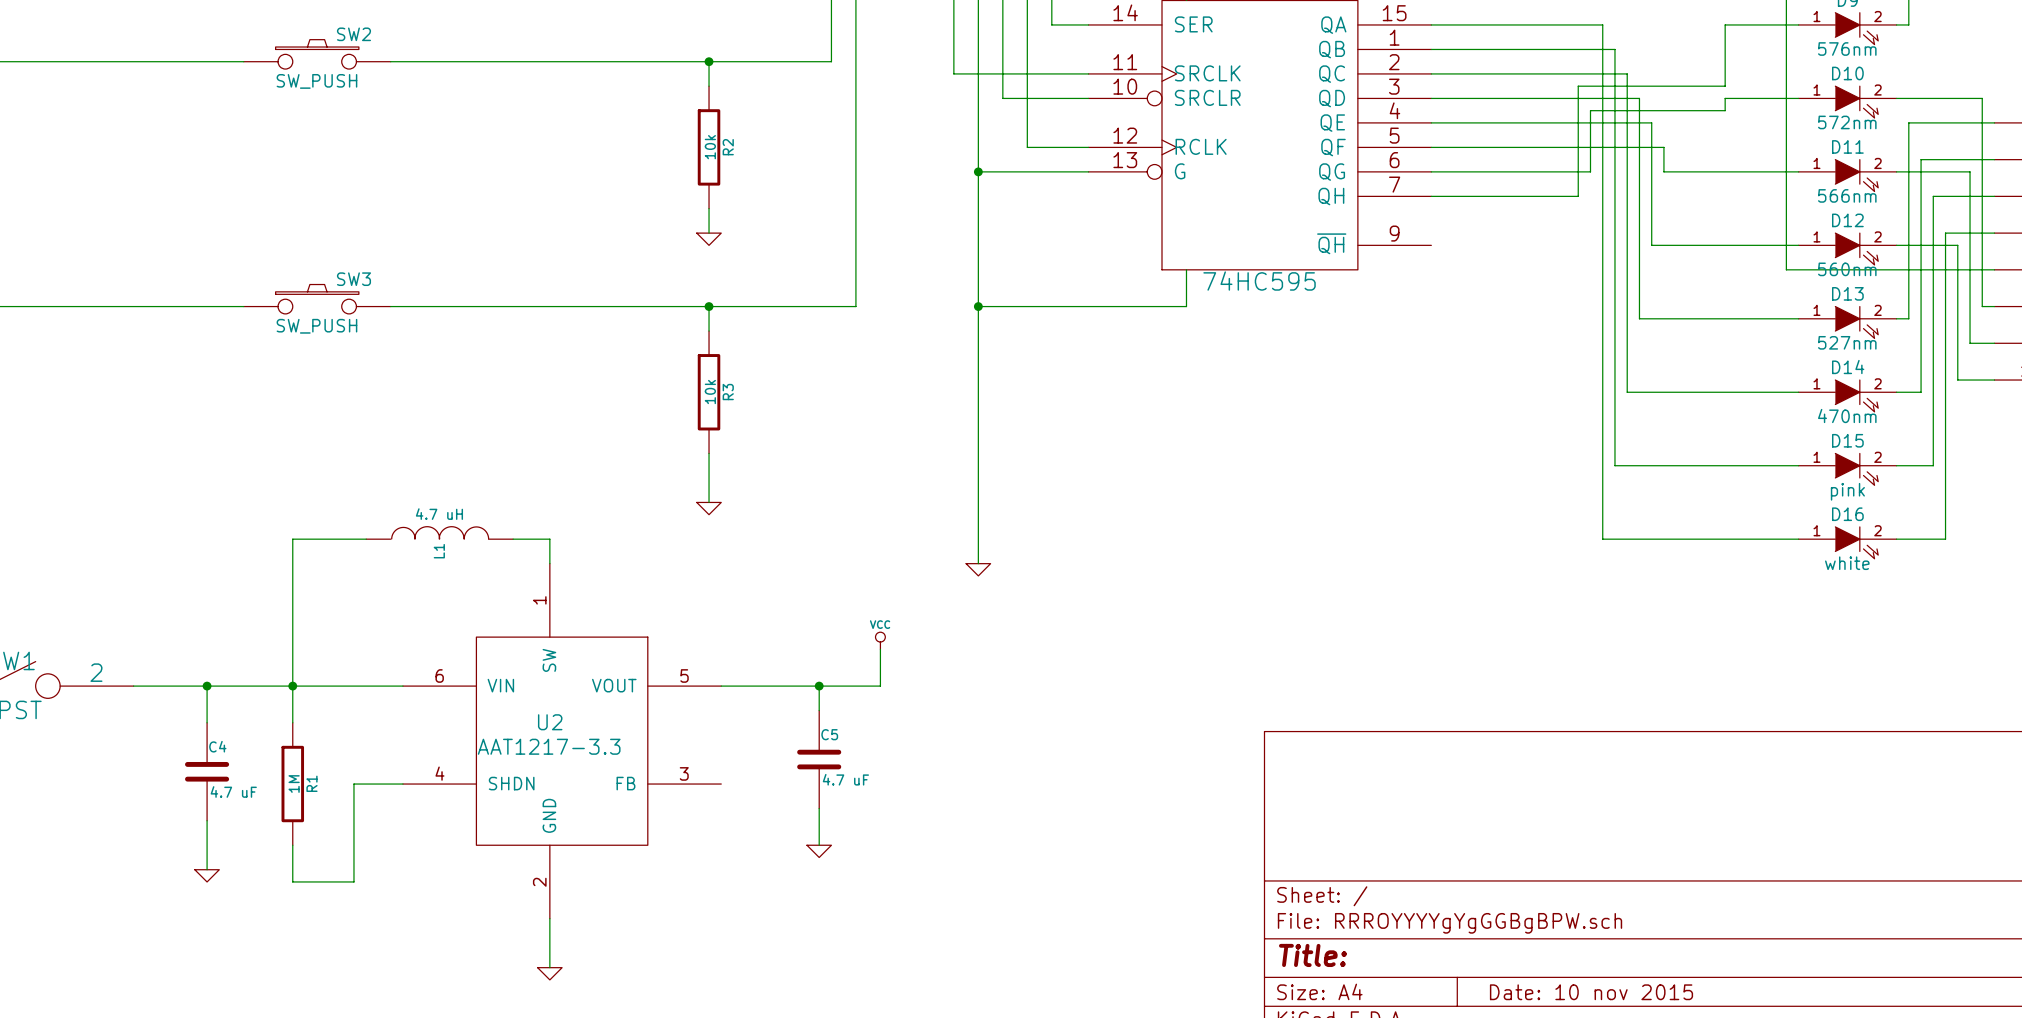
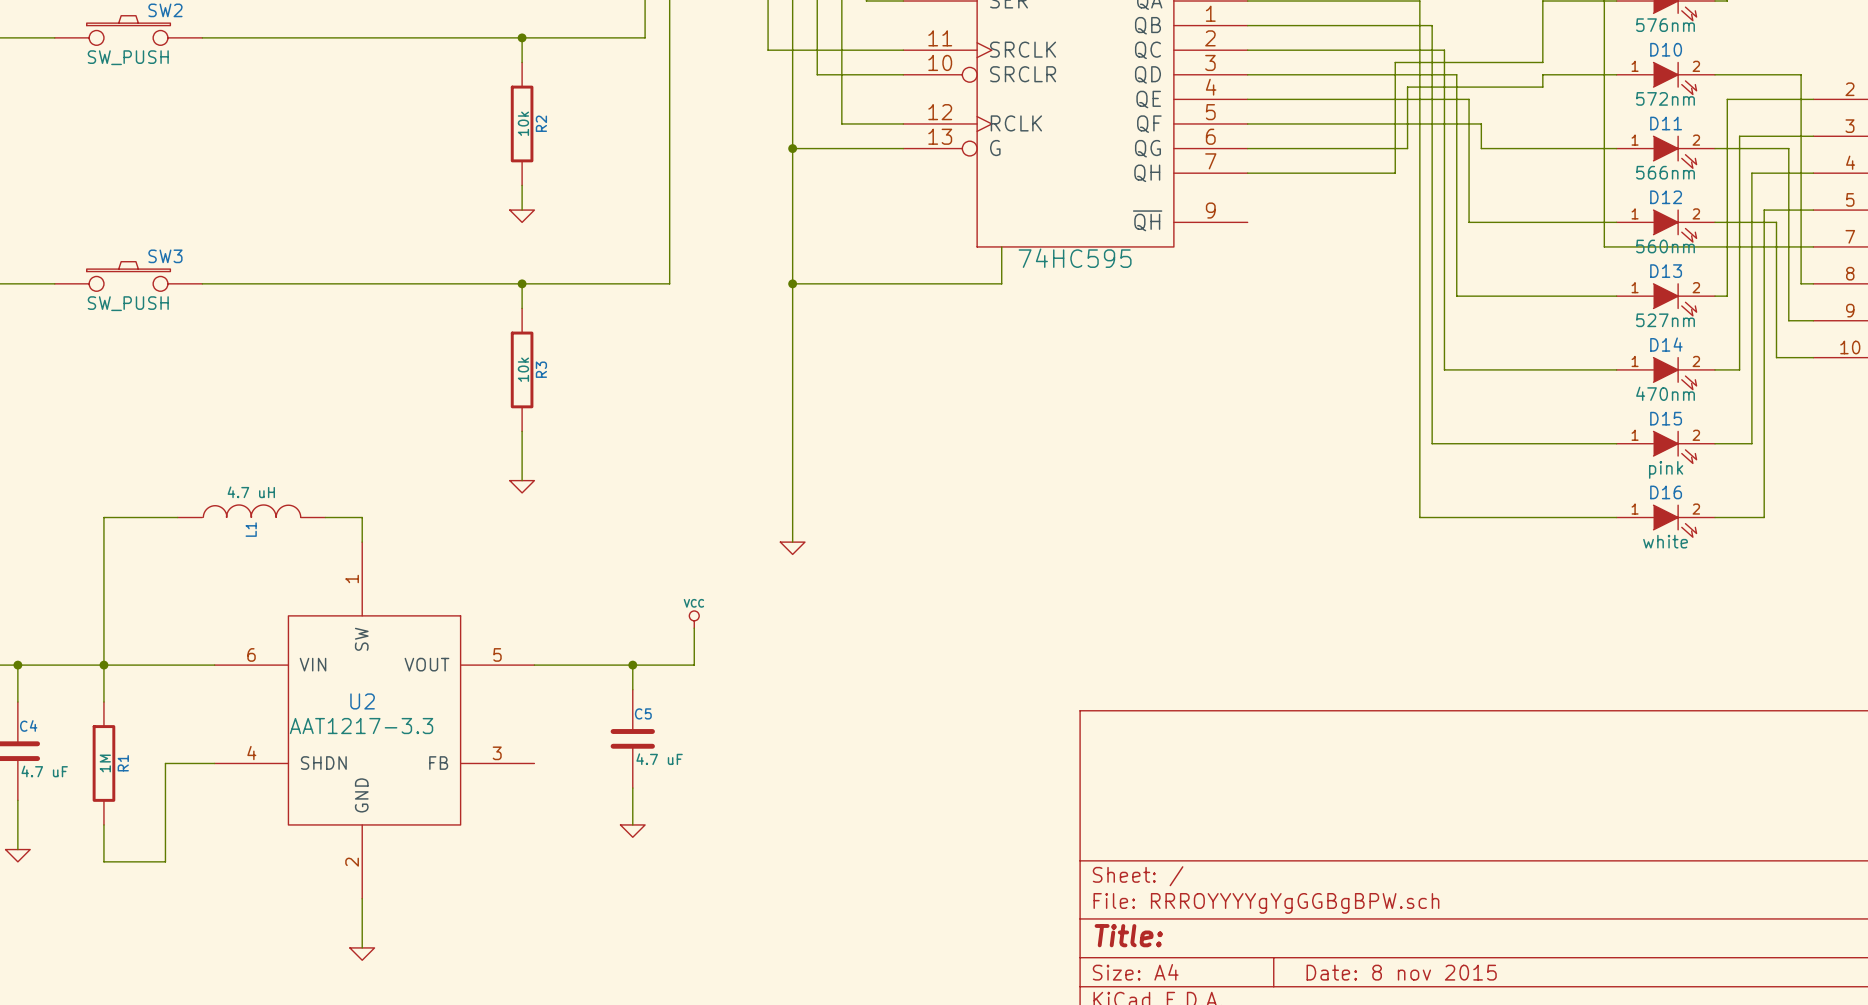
title block: Date: 10 nov 2015 (1591, 992) -> Date: 8 nov 2015 (1401, 972)

